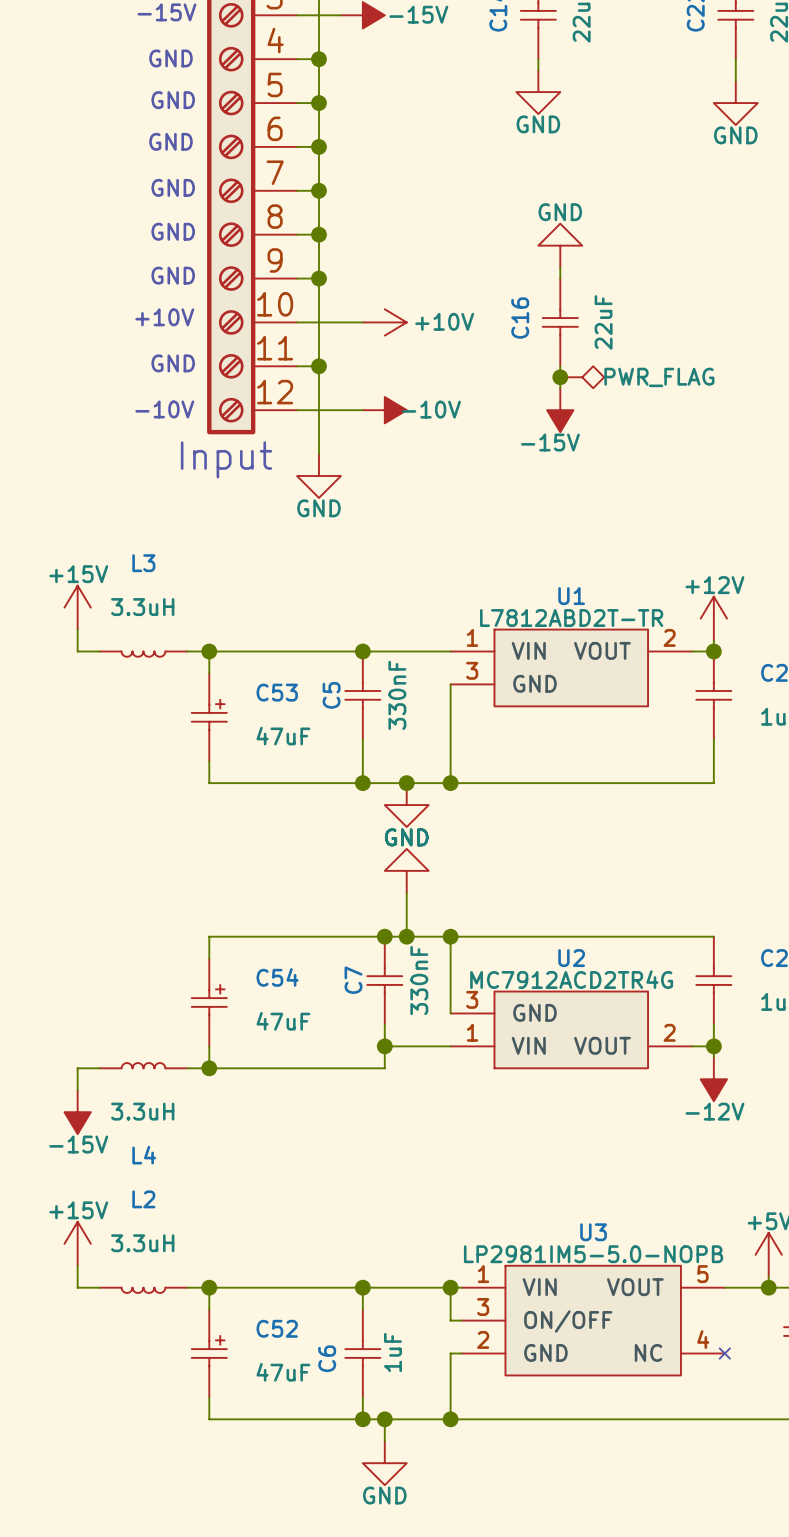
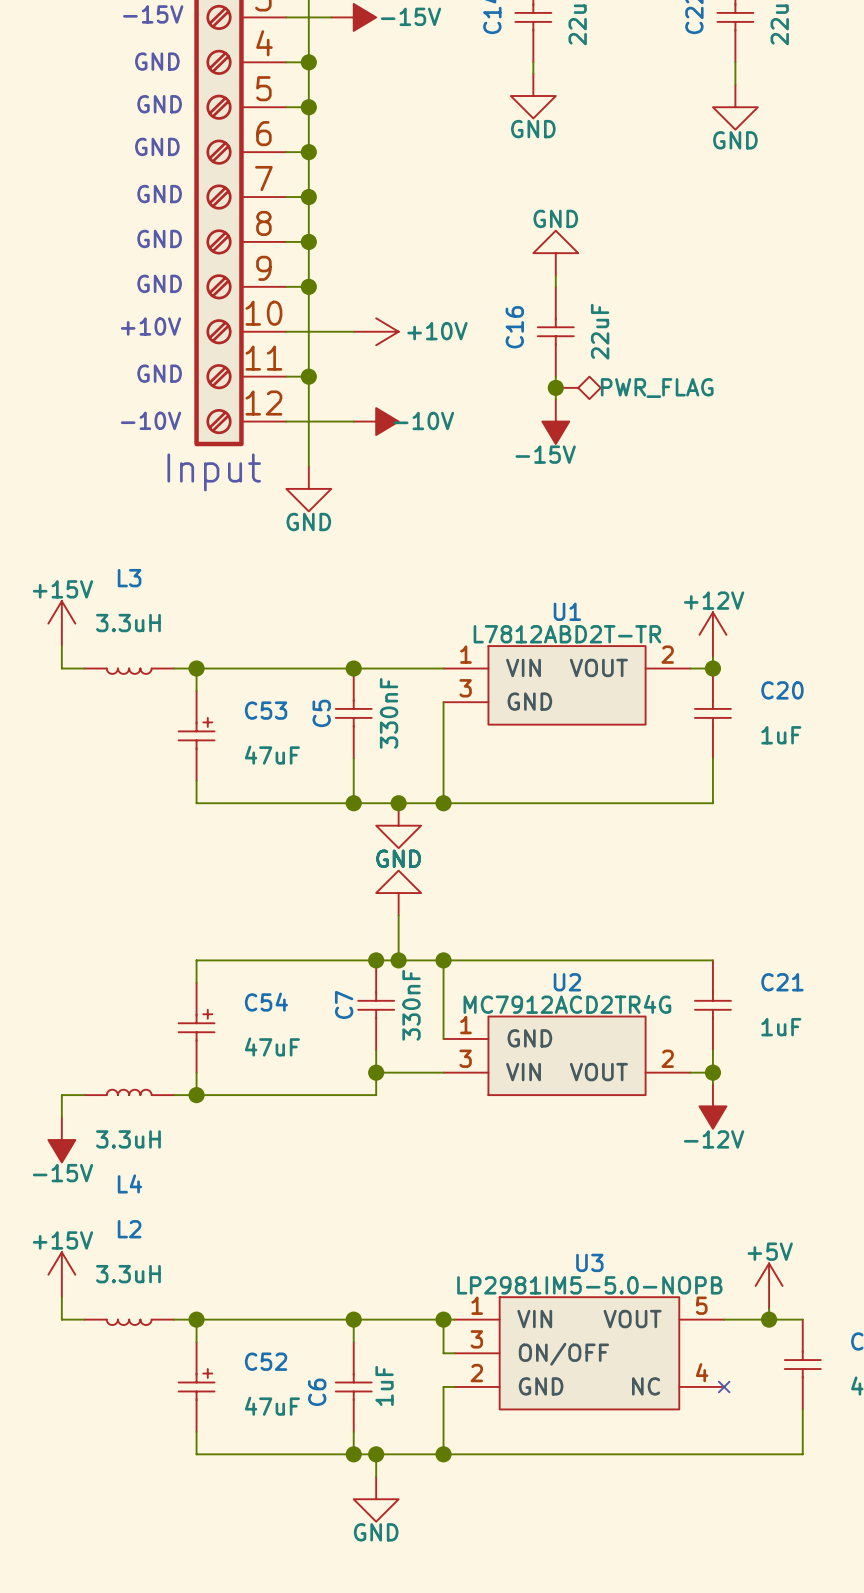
U2 pin number: 3 (472, 999) -> 1 (465, 1025)
U2 pin number: 1 (472, 1032) -> 3 (465, 1058)

